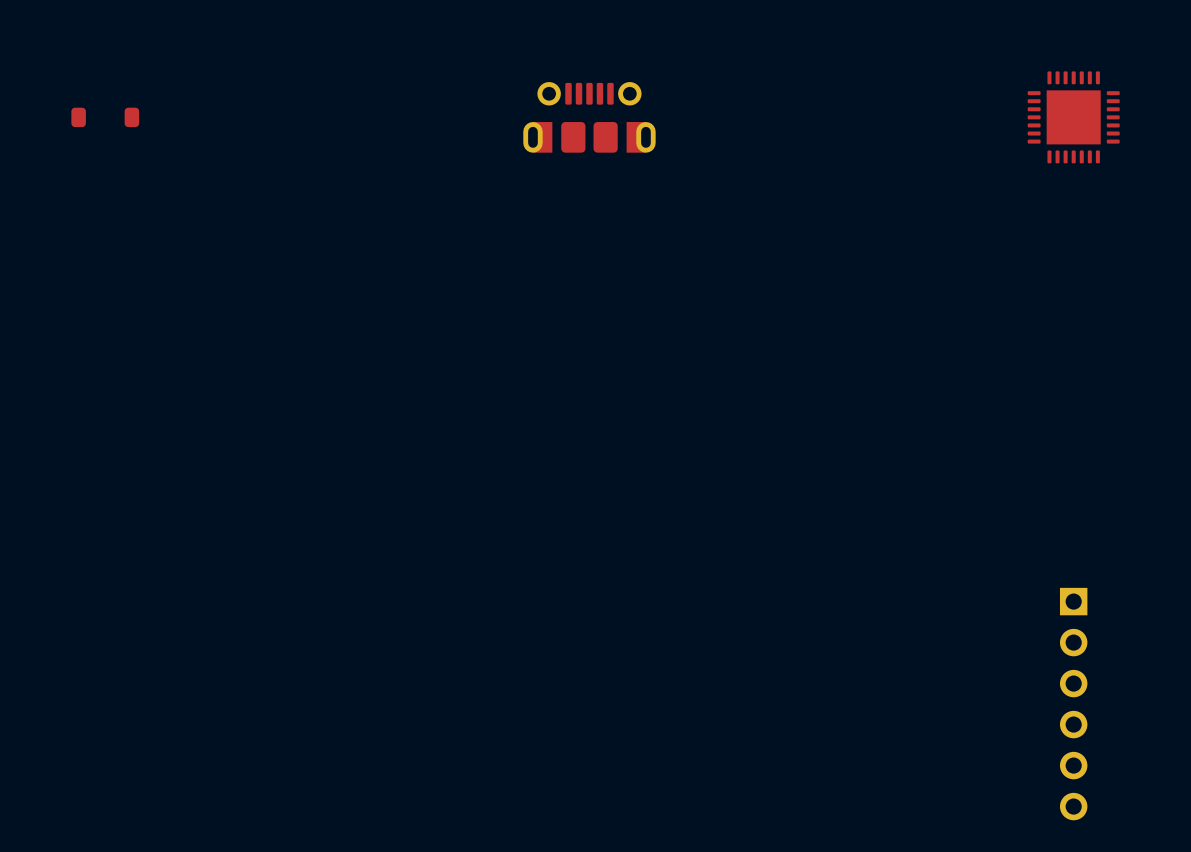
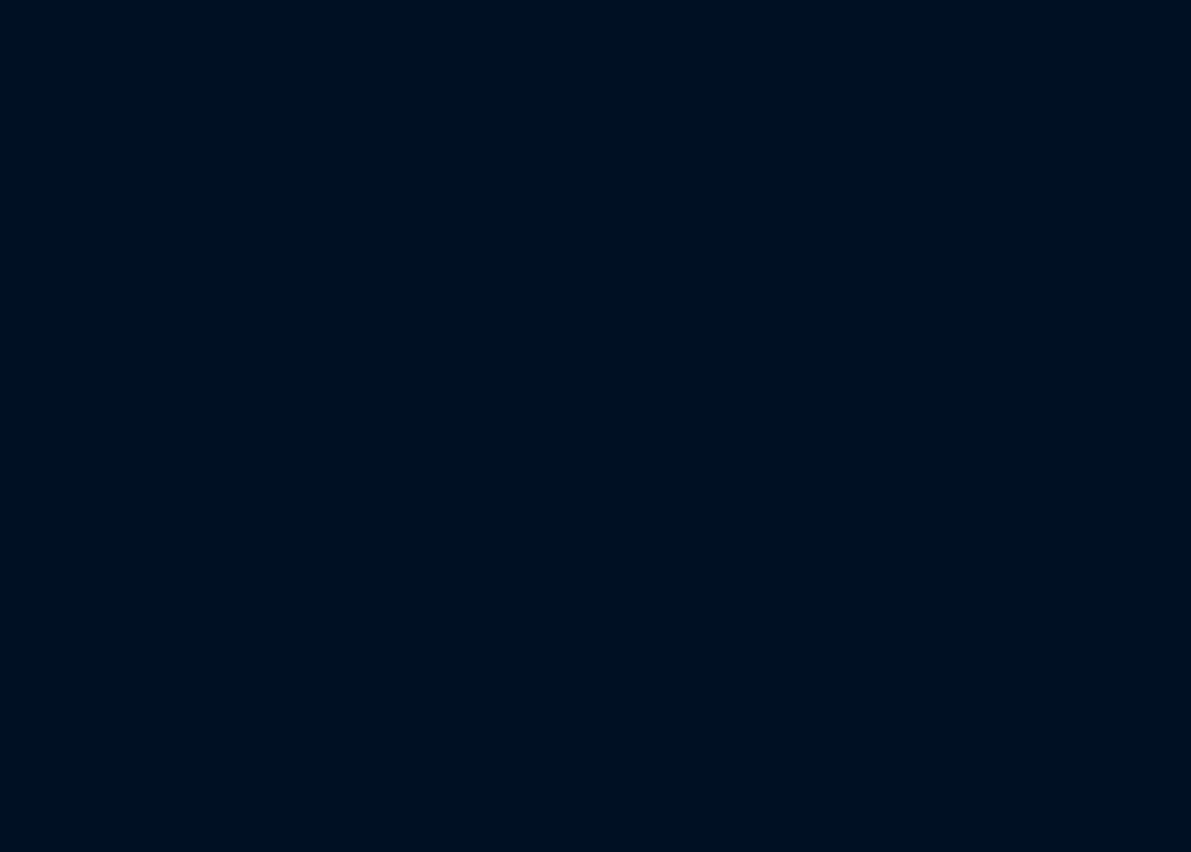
part: (105, 117) -> none
part: (589, 117) -> none
part: (1073, 117) -> none
part: (1073, 704) -> none

